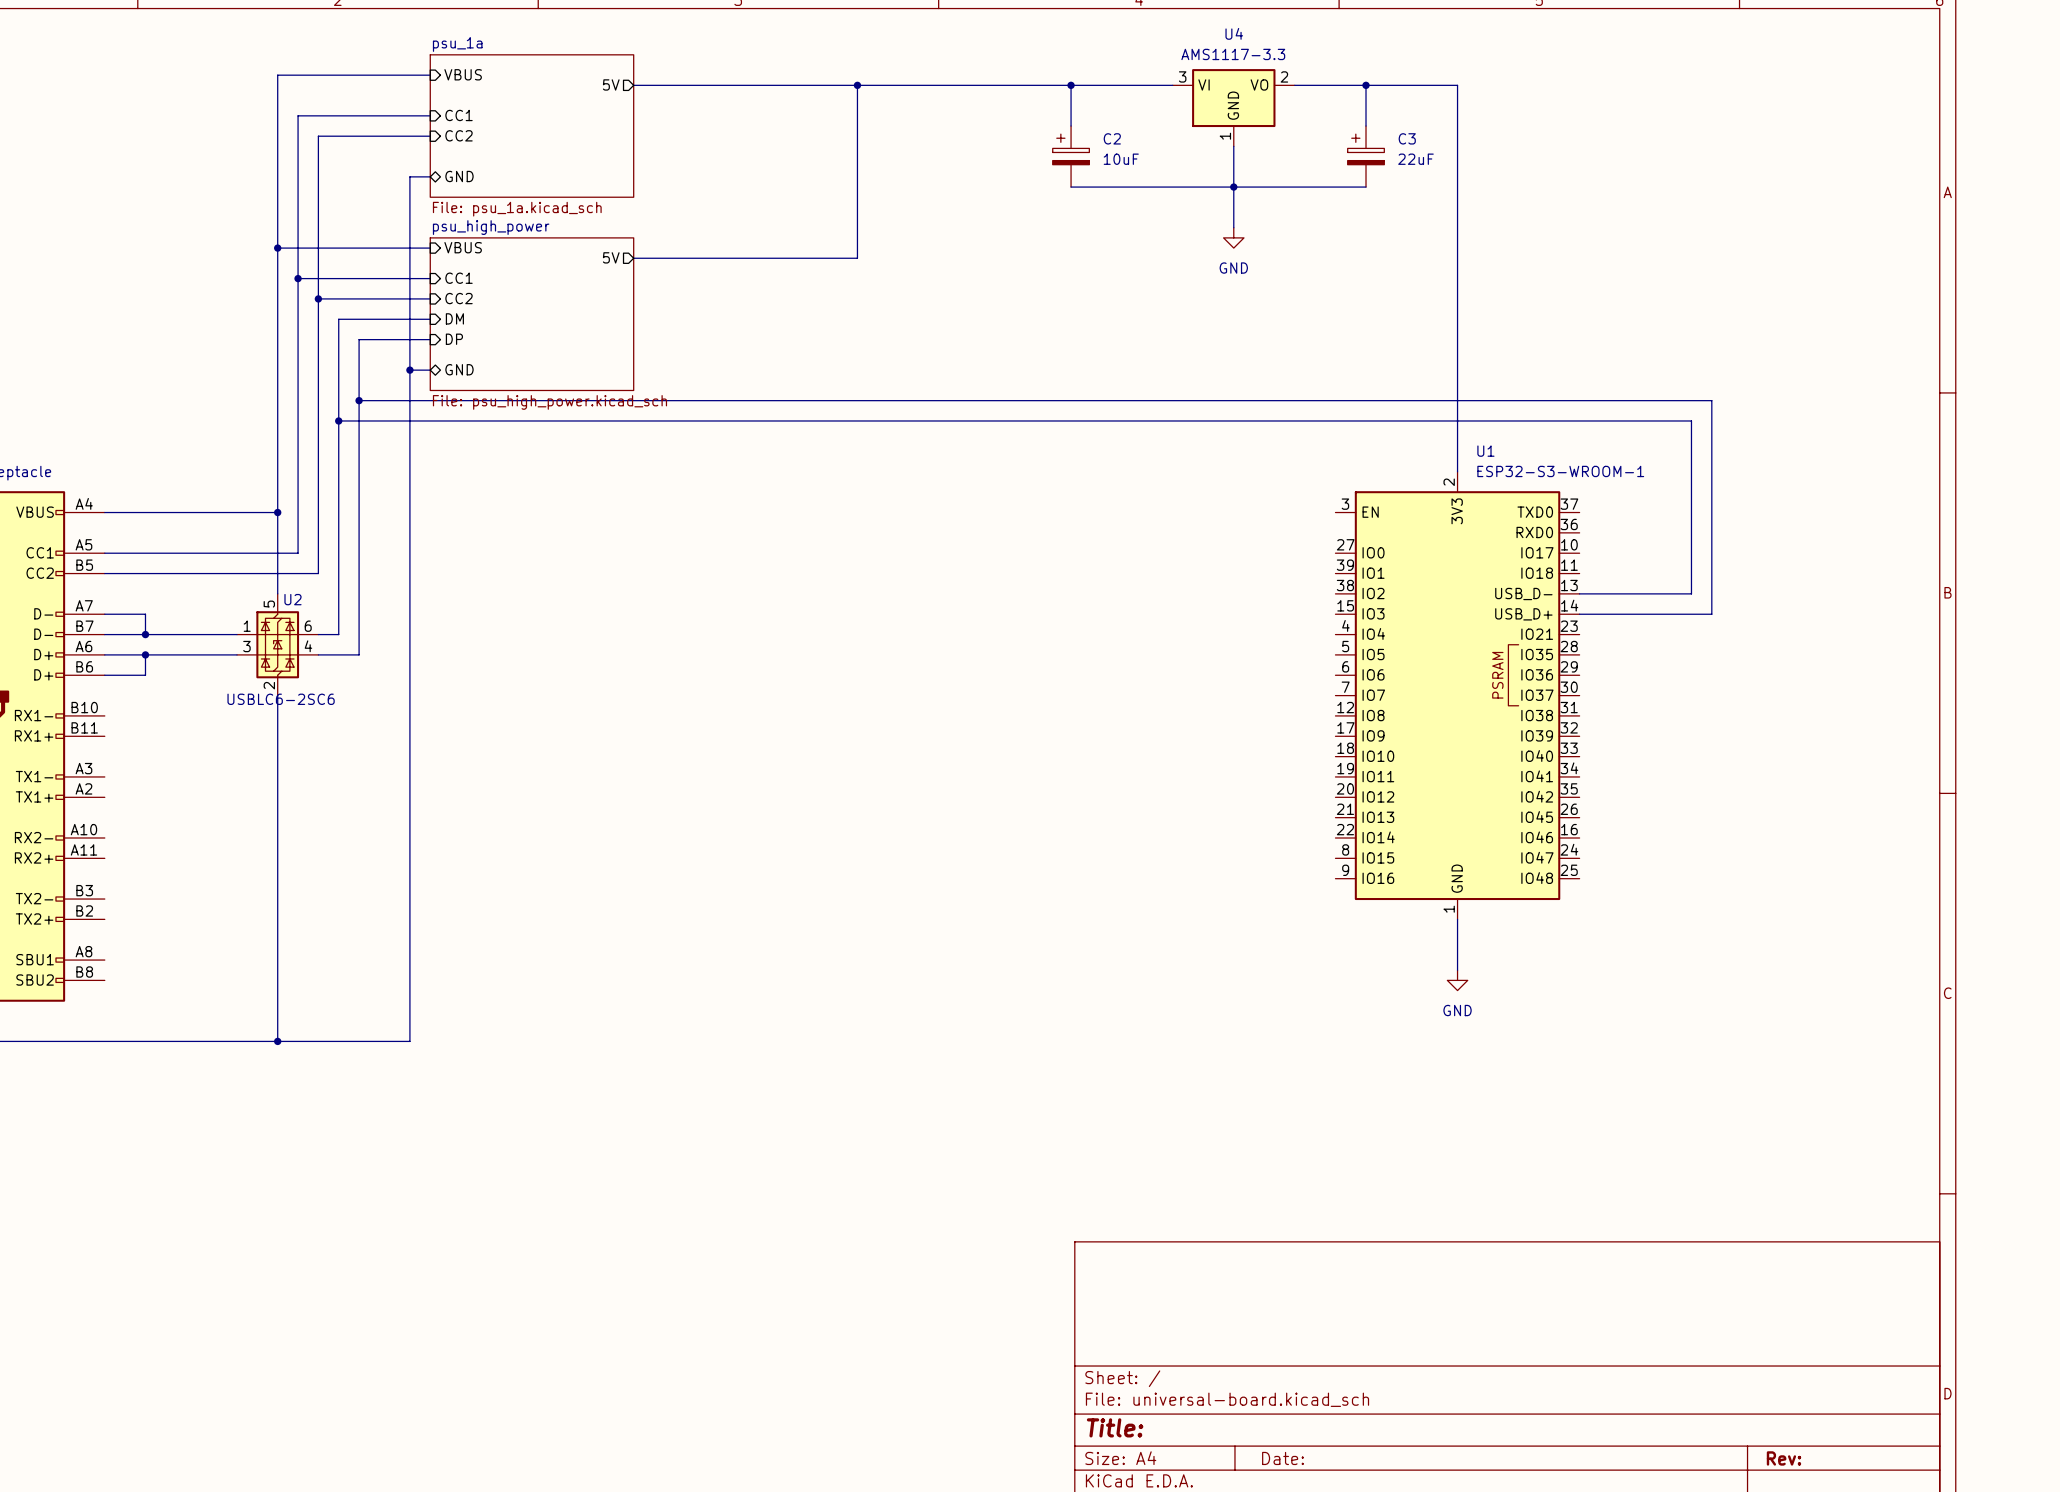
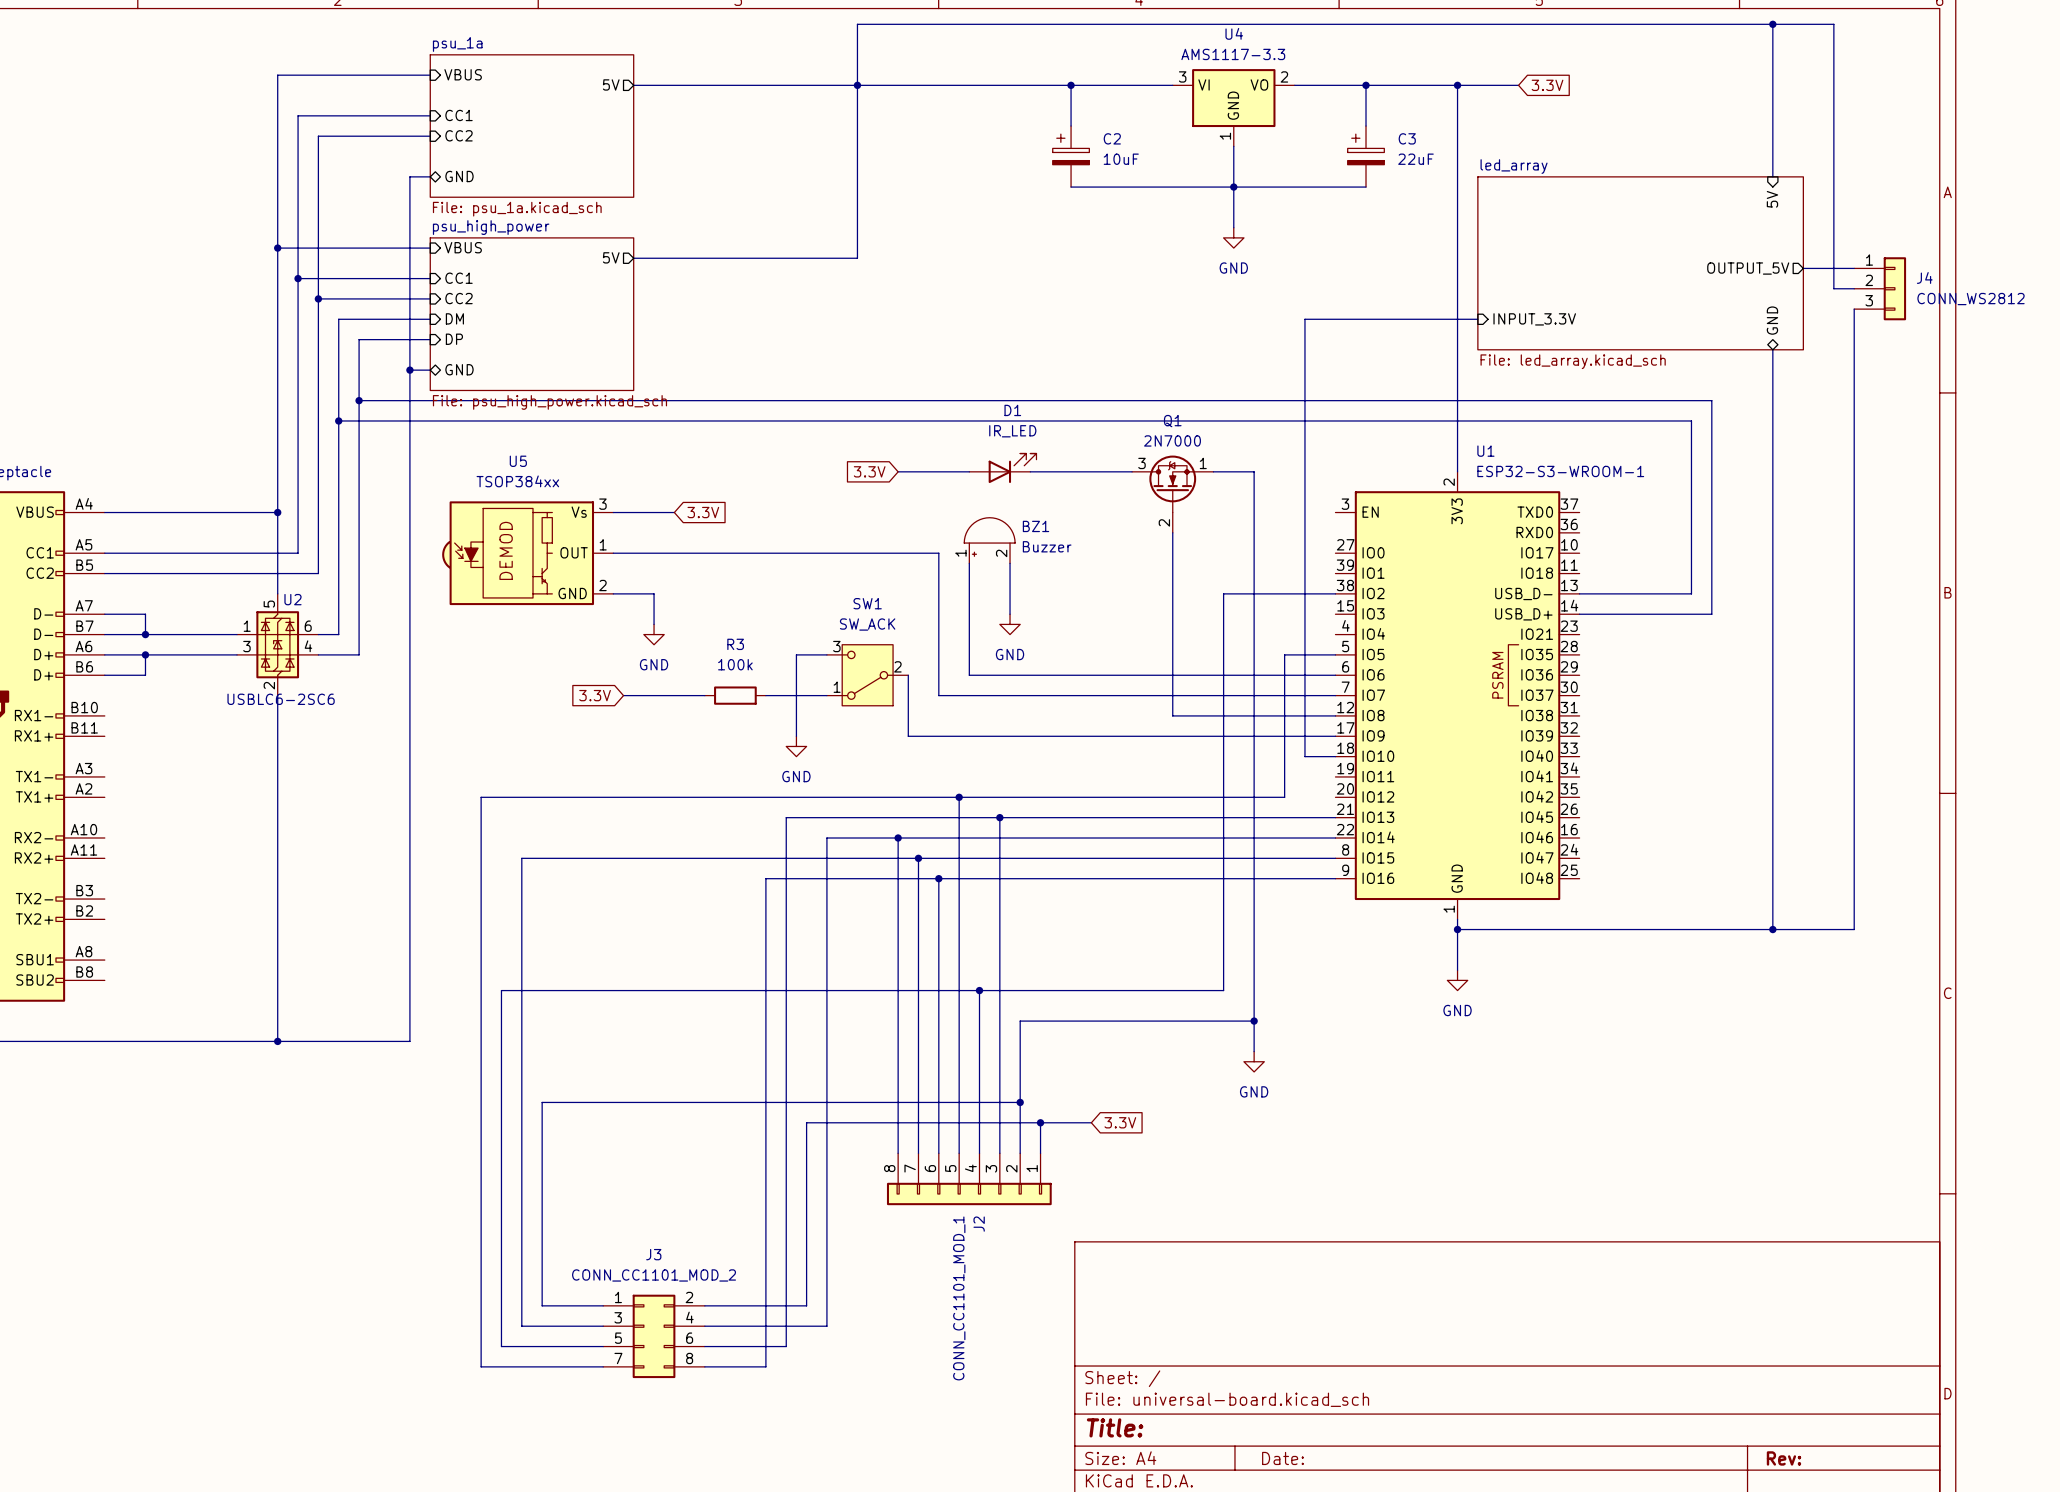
wire: none -> (1772, 24) (1772, 176)
junction: none -> (1772, 24)
wire: none -> (857, 85) (857, 24) (1833, 24) (1833, 288) (1854, 288)
wire: none -> (1457, 85) (1518, 85)
junction: none -> (1457, 85)
global label: none -> 3.3V (1547, 85)
sheet pin: none -> 5V (1772, 199)
sheet led_array: none -> File: led_array.kicad_sch (1640, 263)
sheet pin: none -> OUTPUT_5V (1748, 268)
wire: none -> (1803, 268) (1854, 268)
J4: none -> CONN_WS2812 (1880, 288)
wire: none -> (1854, 309) (1854, 929) (1457, 929)
wire: none -> (1477, 319) (1304, 319) (1304, 756) (1335, 756)
sheet pin: none -> INPUT_3.3V (1534, 319)
sheet pin: none -> GND (1772, 320)
wire: none -> (1772, 349) (1772, 929)
D1: none -> IR_LED (1002, 468)
global label: none -> 3.3V (869, 471)
wire: none -> (898, 471) (969, 471)
wire: none -> (1030, 471) (1132, 471)
wire: none -> (1213, 471) (1254, 471) (1254, 1051)
Q1: none -> 2N7000 (1172, 494)
wire: none -> (613, 512) (674, 512)
global label: none -> 3.3V (703, 512)
wire: none -> (1172, 532) (1172, 715) (1335, 715)
BZ1: none -> Buzzer (989, 540)
U5: none -> TSOP384xx (527, 553)
wire: none -> (613, 553) (938, 553) (938, 695) (1335, 695)
wire: none -> (969, 563) (969, 675) (1335, 675)
wire: none -> (1010, 563) (1010, 614)
wire: none -> (613, 593) (654, 593) (654, 624)
wire: none -> (1335, 593) (1223, 593) (1223, 990) (501, 990) (501, 1346) (603, 1346)
power symbol: none -> GND (1010, 624)
power symbol: none -> GND (654, 634)
wire: none -> (826, 654) (796, 654) (796, 736)
wire: none -> (1335, 654) (1284, 654) (1284, 797) (481, 797) (481, 1366) (603, 1366)
SW1: none -> SW_ACK (867, 675)
wire: none -> (908, 675) (908, 736) (1335, 736)
global label: none -> 3.3V (595, 695)
wire: none -> (623, 695) (704, 695)
R3: none -> 100k (735, 695)
wire: none -> (765, 695) (826, 695)
power symbol: none -> GND (796, 746)
wire: none -> (959, 797) (959, 1153)
junction: none -> (959, 797)
wire: none -> (999, 817) (999, 1153)
junction: none -> (999, 817)
wire: none -> (1335, 817) (786, 817) (786, 1346) (704, 1346)
wire: none -> (898, 838) (898, 1153)
junction: none -> (898, 838)
wire: none -> (1335, 838) (826, 838) (826, 1326) (704, 1326)
wire: none -> (918, 858) (918, 1153)
junction: none -> (918, 858)
wire: none -> (1335, 858) (521, 858) (521, 1326) (603, 1326)
wire: none -> (938, 878) (938, 1153)
junction: none -> (938, 878)
wire: none -> (1335, 878) (765, 878) (765, 1366) (704, 1366)
junction: none -> (1457, 929)
junction: none -> (1772, 929)
wire: none -> (979, 990) (979, 1153)
junction: none -> (979, 990)
wire: none -> (1254, 1021) (1020, 1021) (1020, 1153)
junction: none -> (1254, 1021)
power symbol: none -> GND (1254, 1061)
wire: none -> (1020, 1102) (542, 1102) (542, 1305) (603, 1305)
junction: none -> (1020, 1102)
wire: none -> (1040, 1122) (1040, 1153)
junction: none -> (1040, 1122)
wire: none -> (1091, 1122) (806, 1122) (806, 1305) (704, 1305)
global label: none -> 3.3V (1120, 1122)
J2: none -> CONN_CC1101_MOD_1 (969, 1179)
J3: none -> CONN_CC1101_MOD_2 (654, 1336)

